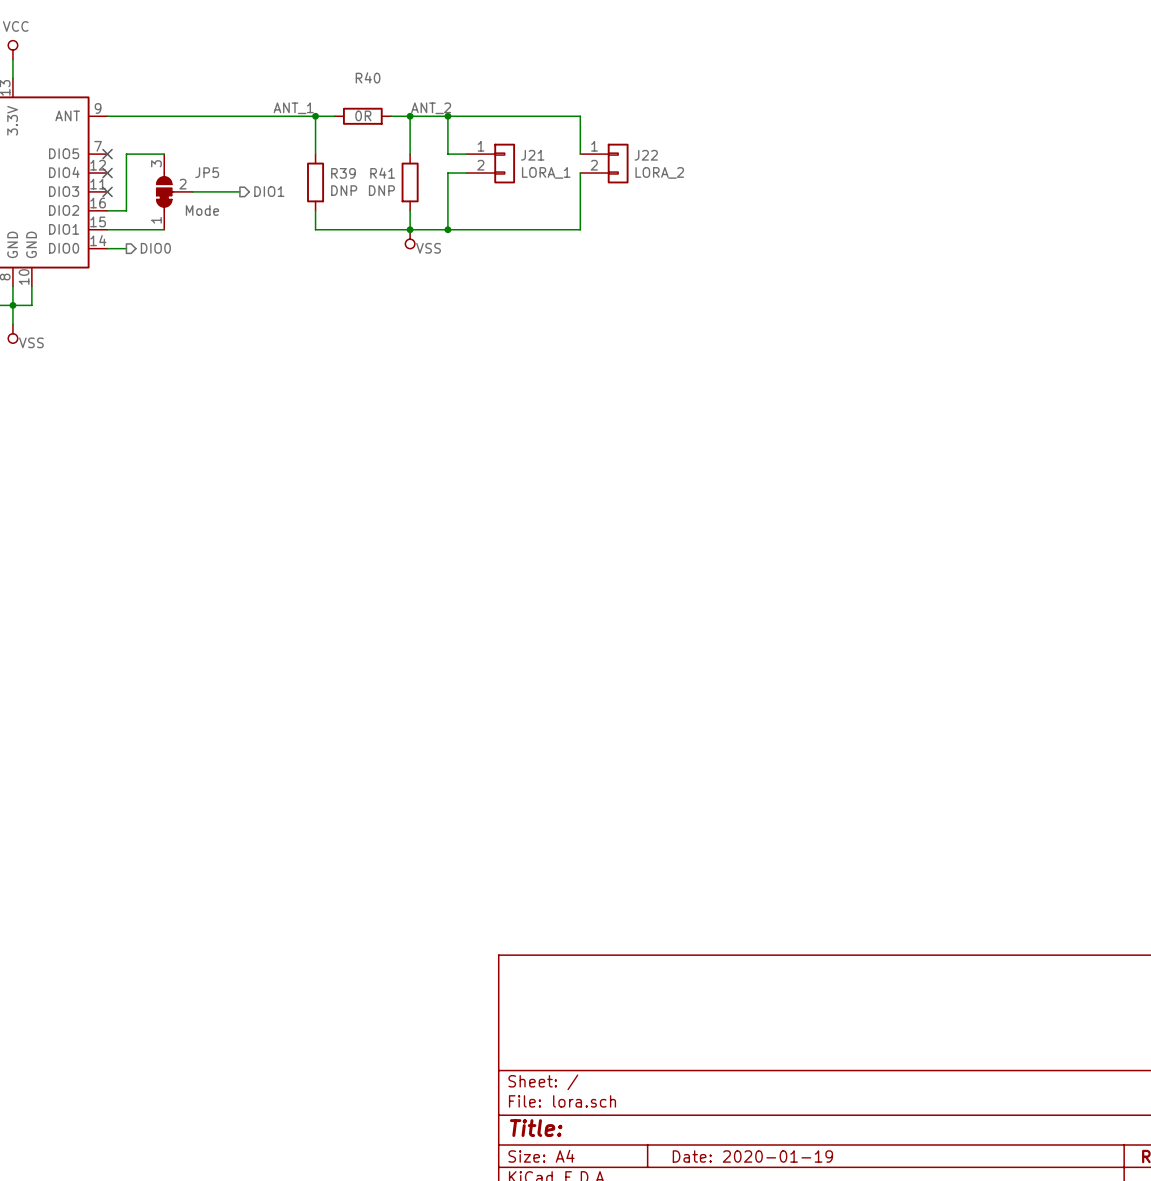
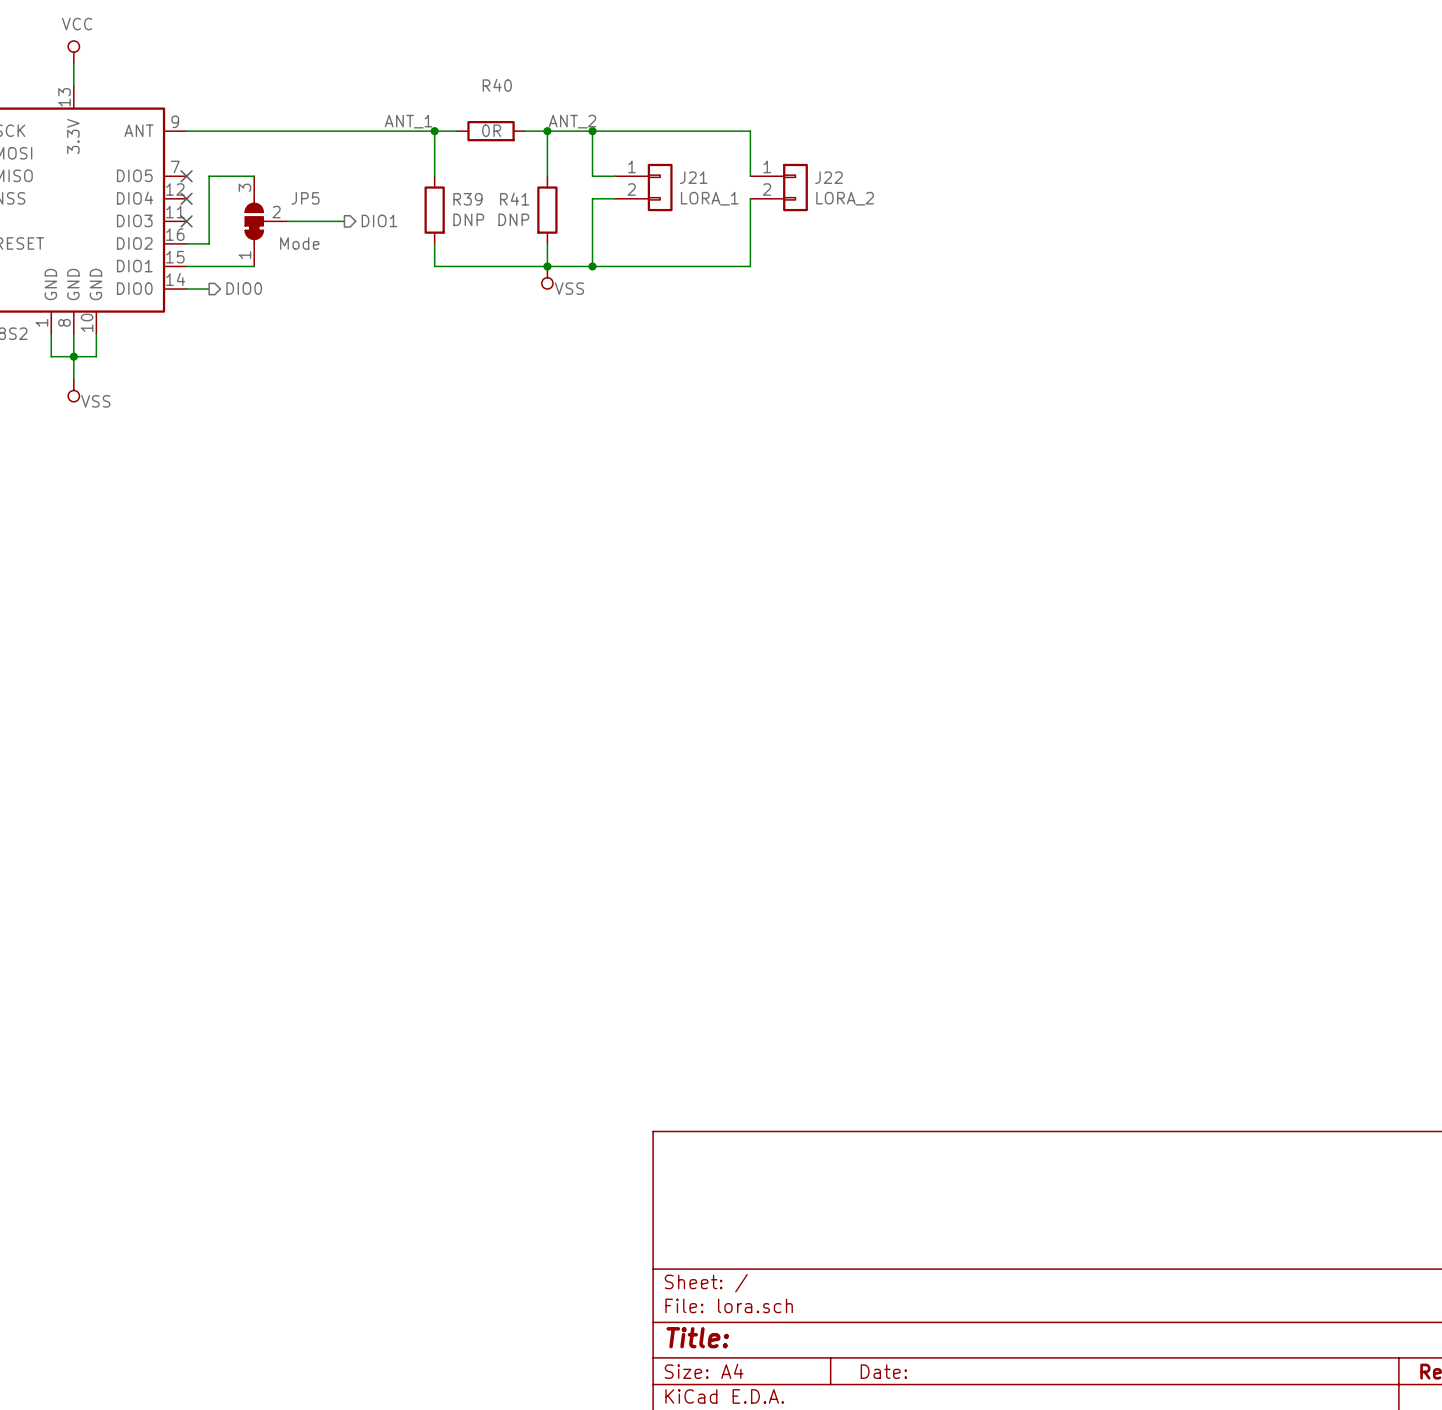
title block: Date: 2020-01-19 (752, 1156) -> Date: (883, 1371)

